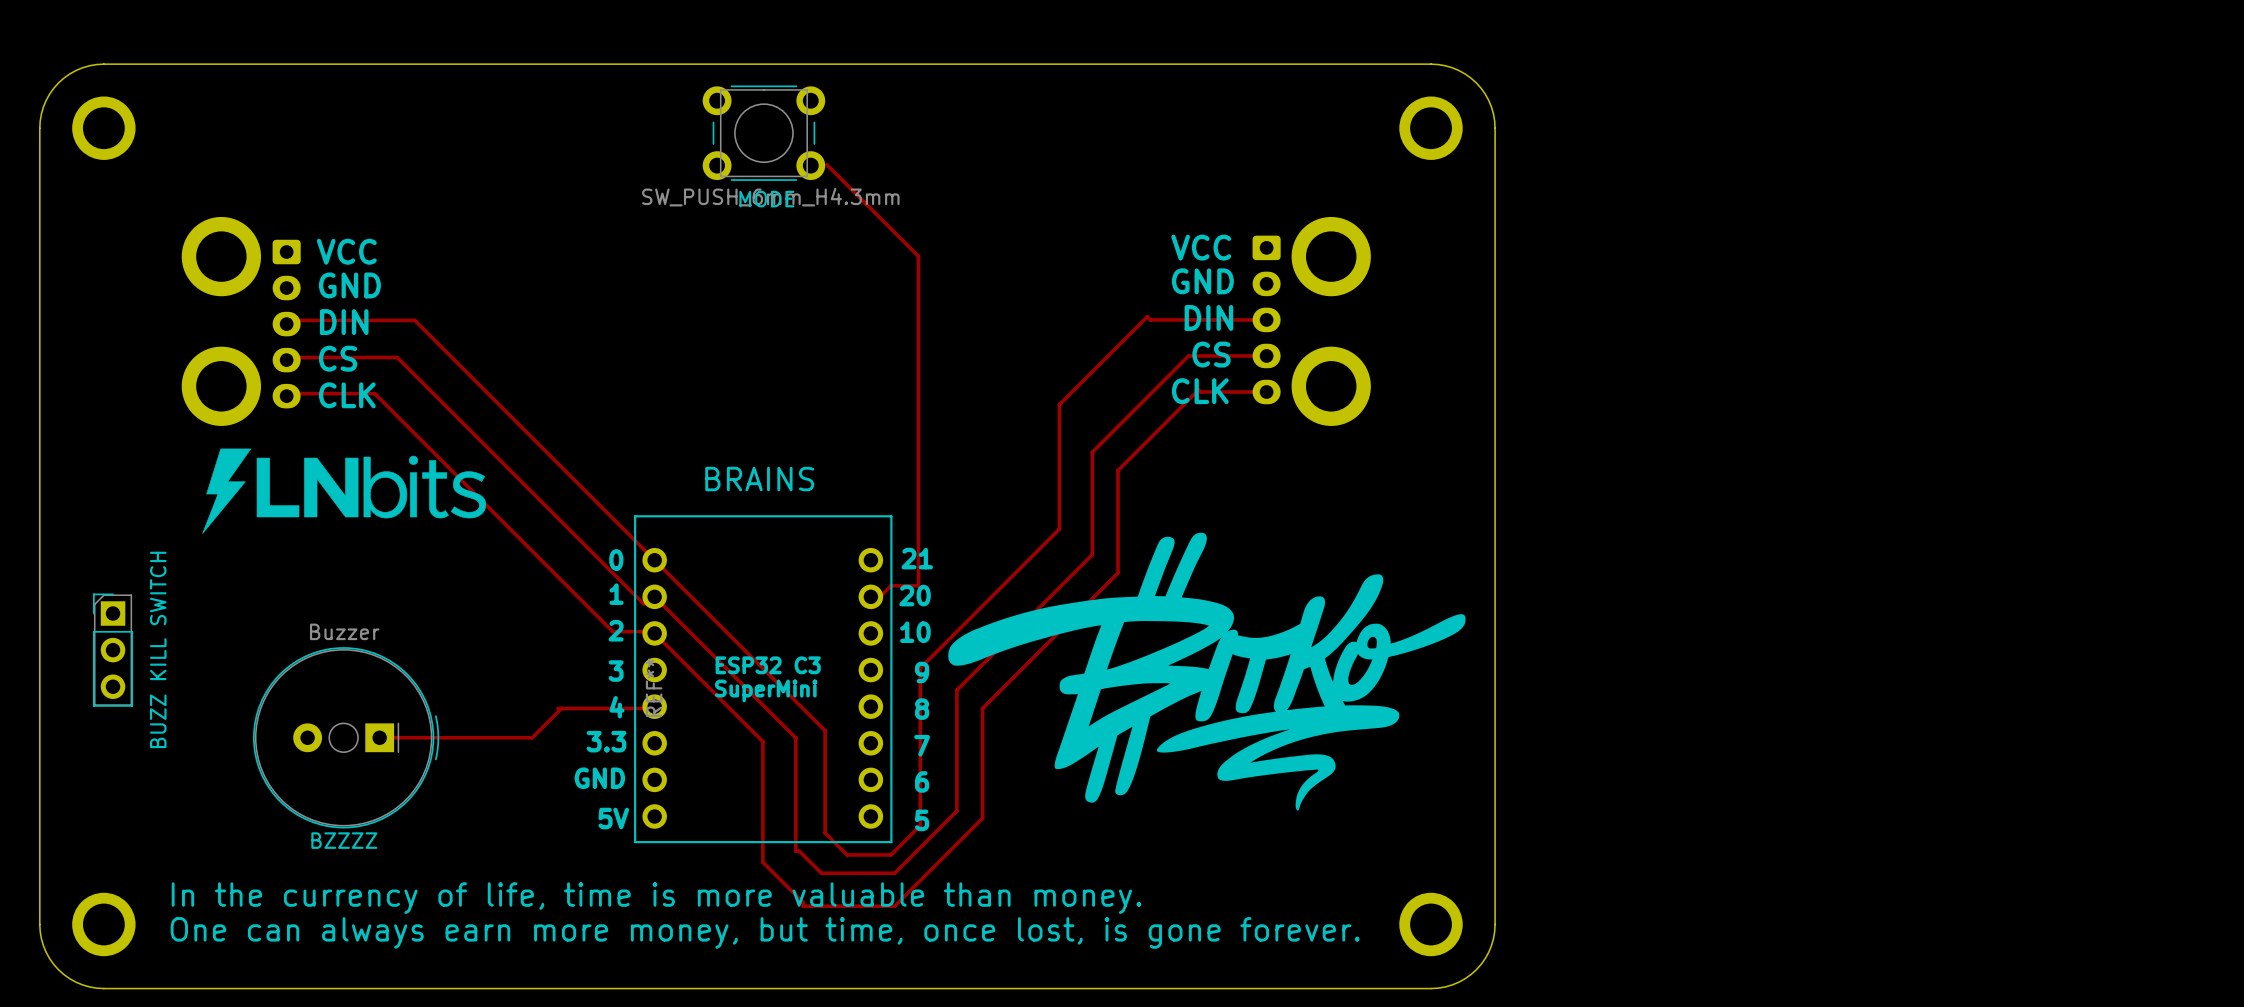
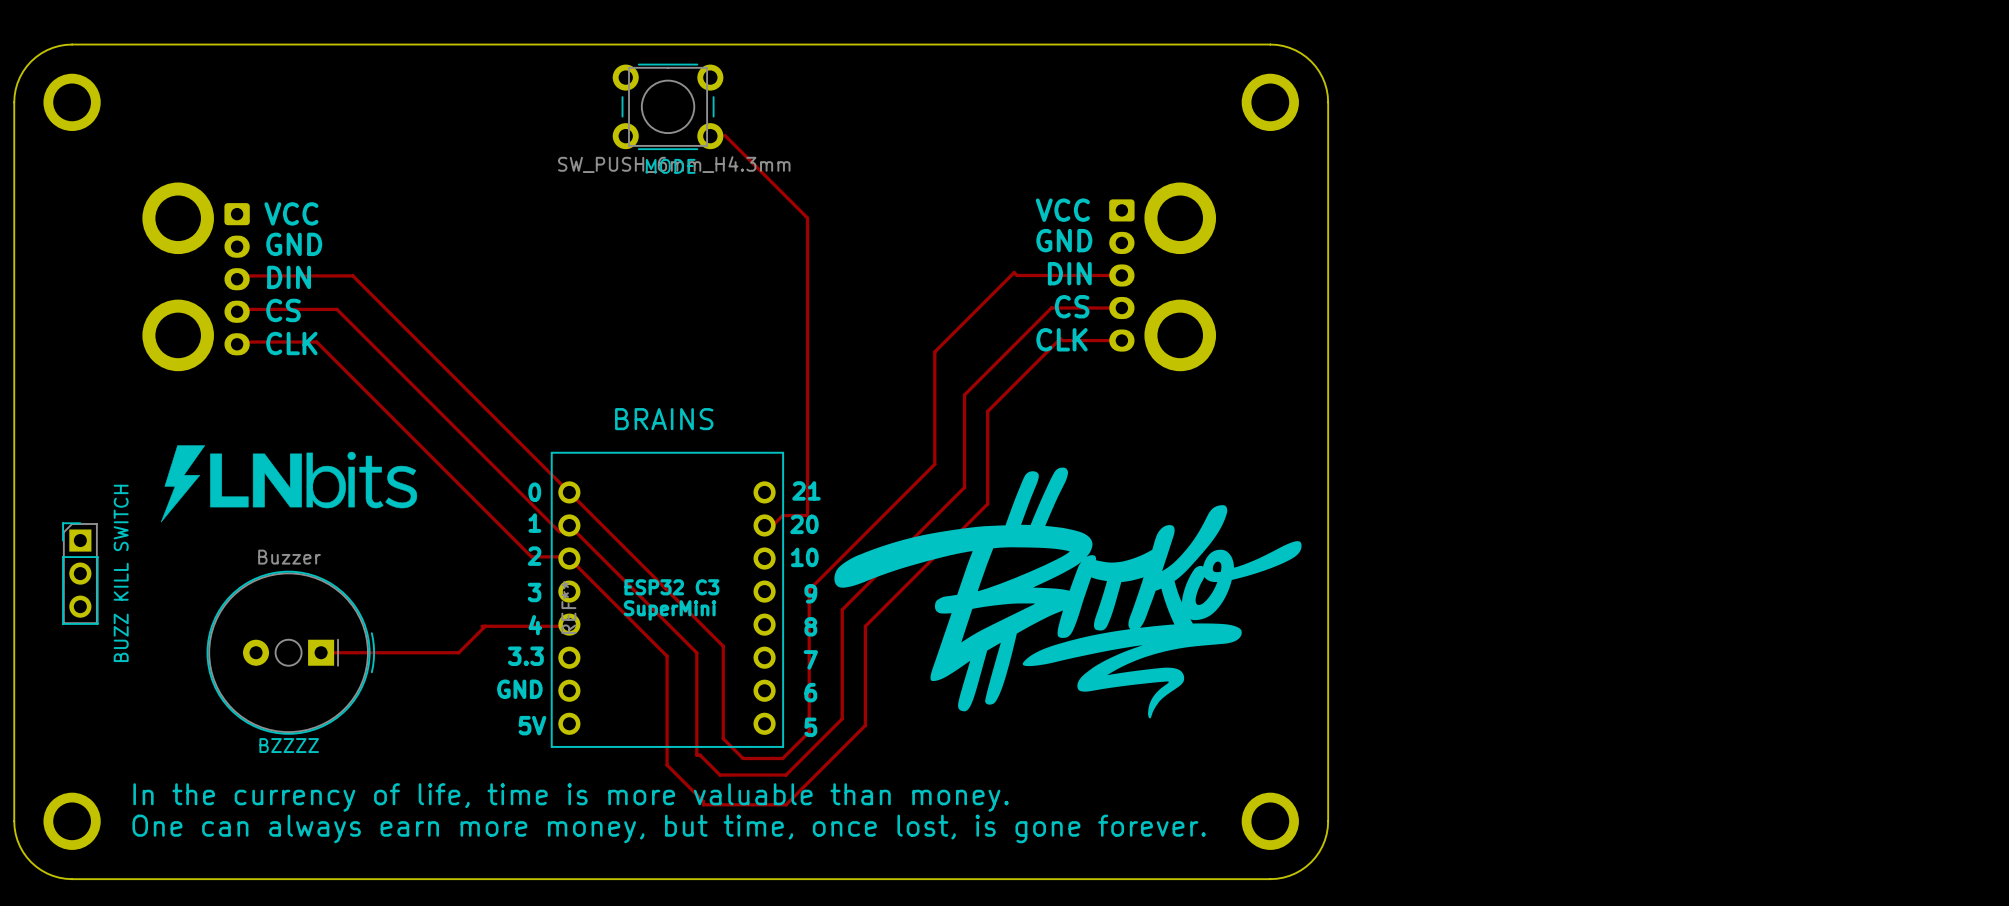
drawing position: (413, 460) -> (351, 455)
drawing position: (278, 487) -> (229, 480)
drawing position: (331, 487) -> (277, 480)
drawing position: (385, 487) -> (326, 480)
drawing position: (435, 489) -> (371, 482)
drawing position: (226, 491) -> (182, 483)
drawing position: (413, 494) -> (351, 487)
drawing position: (468, 494) -> (401, 487)

